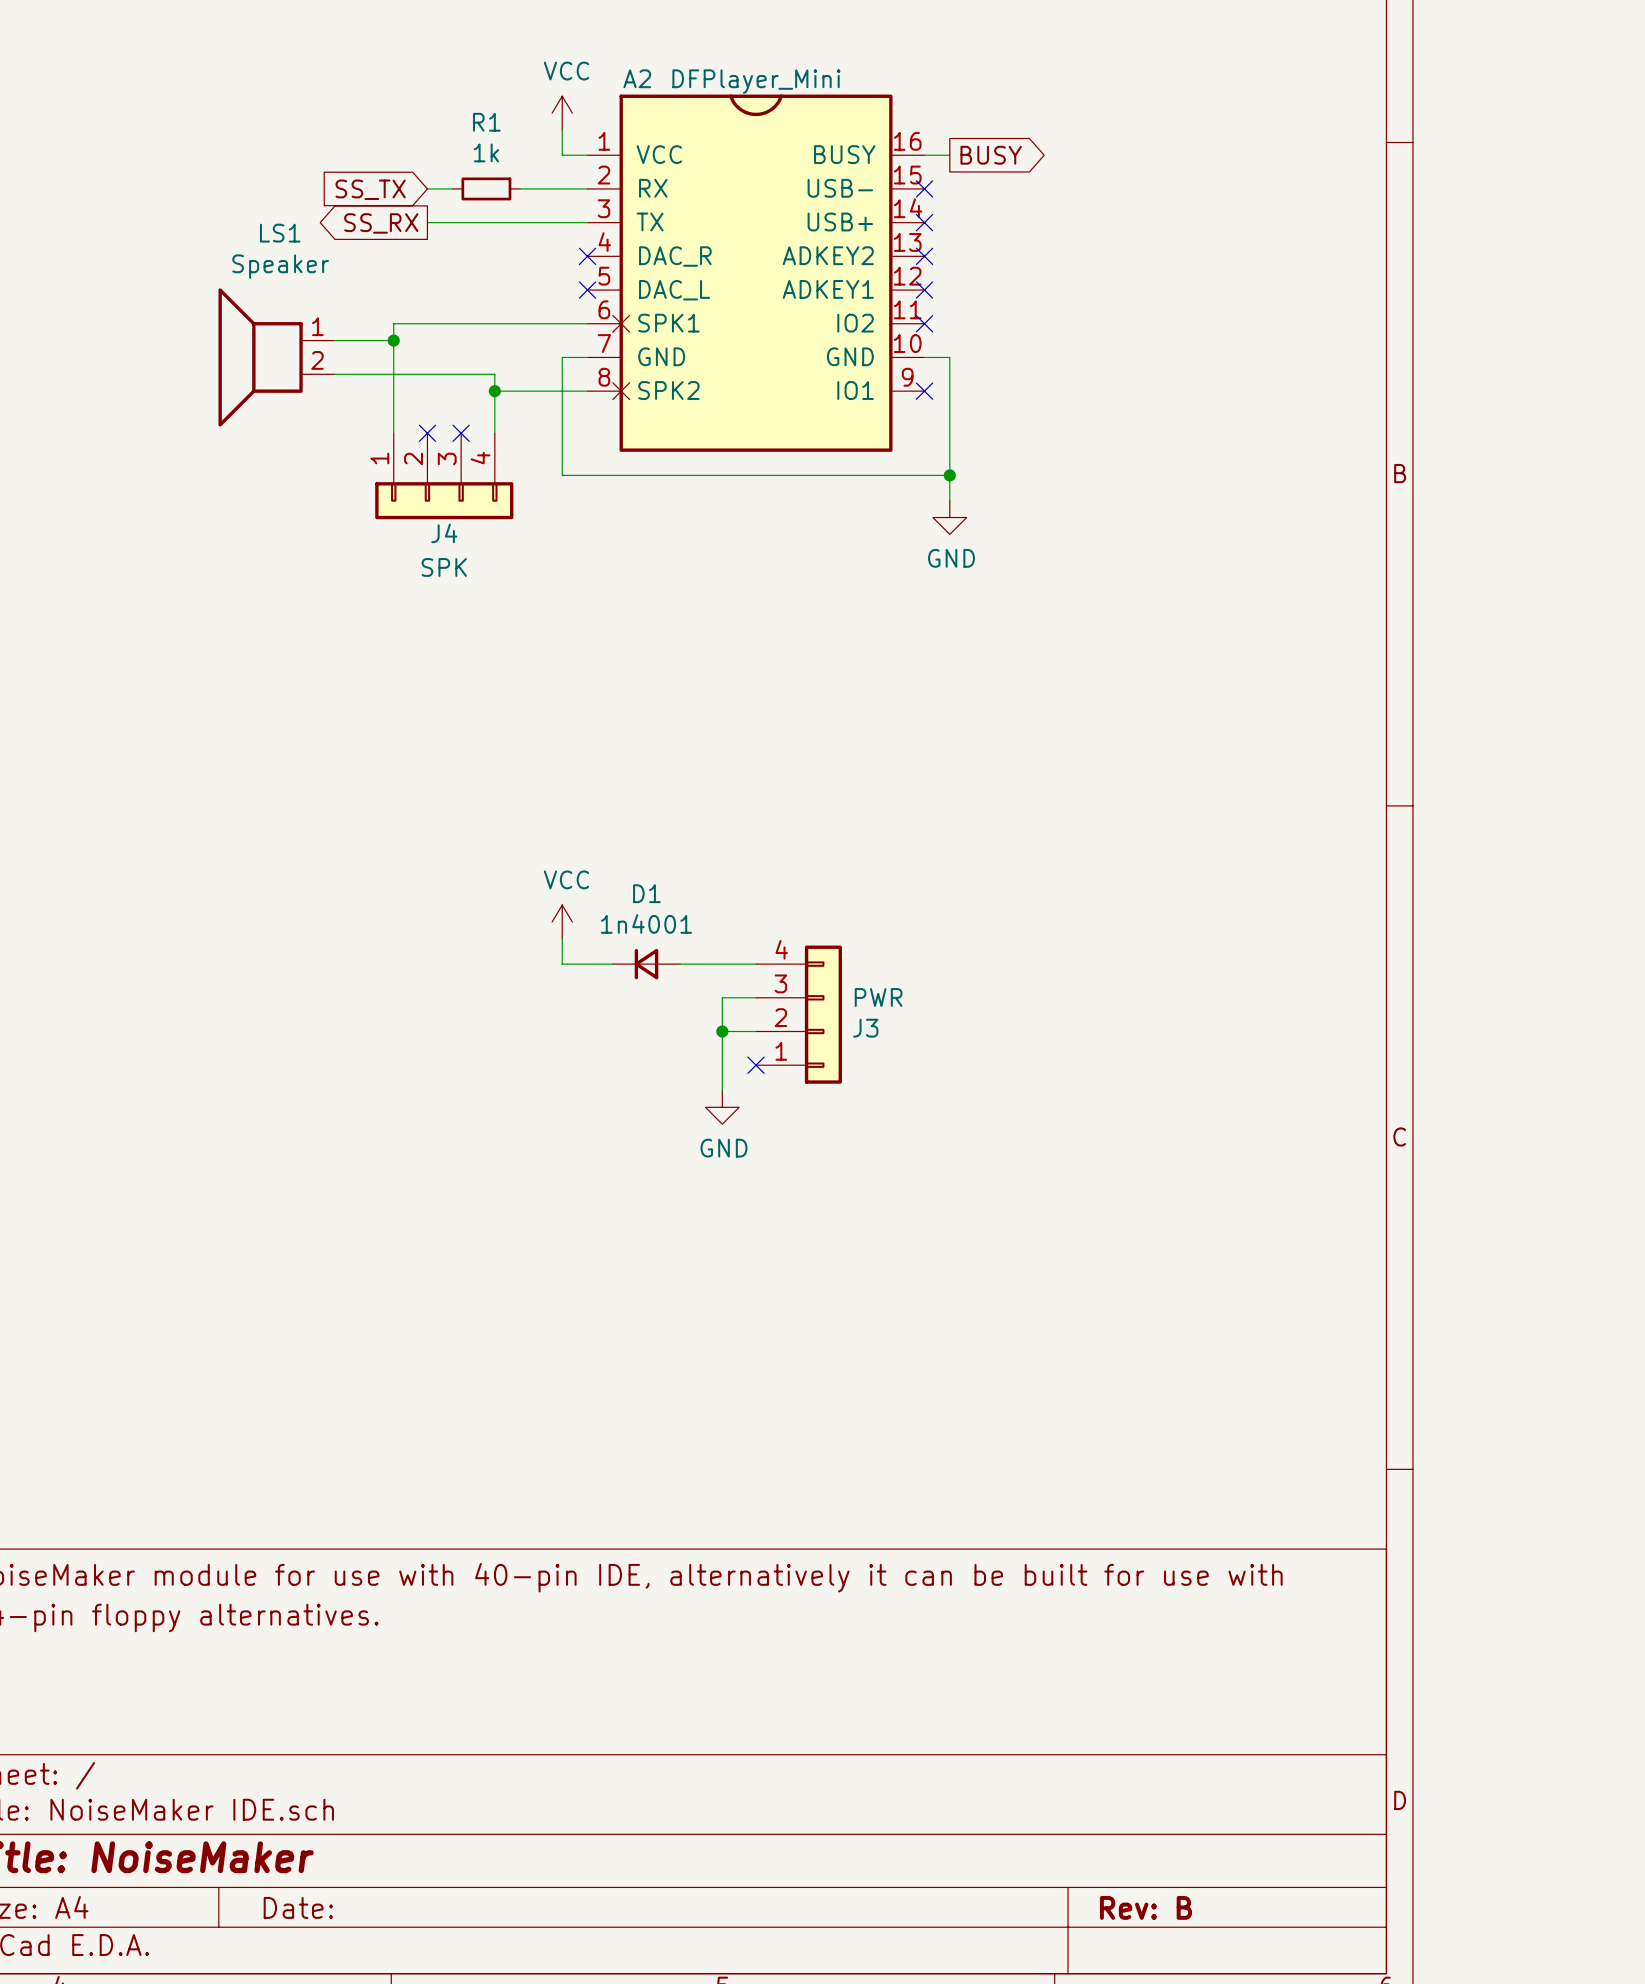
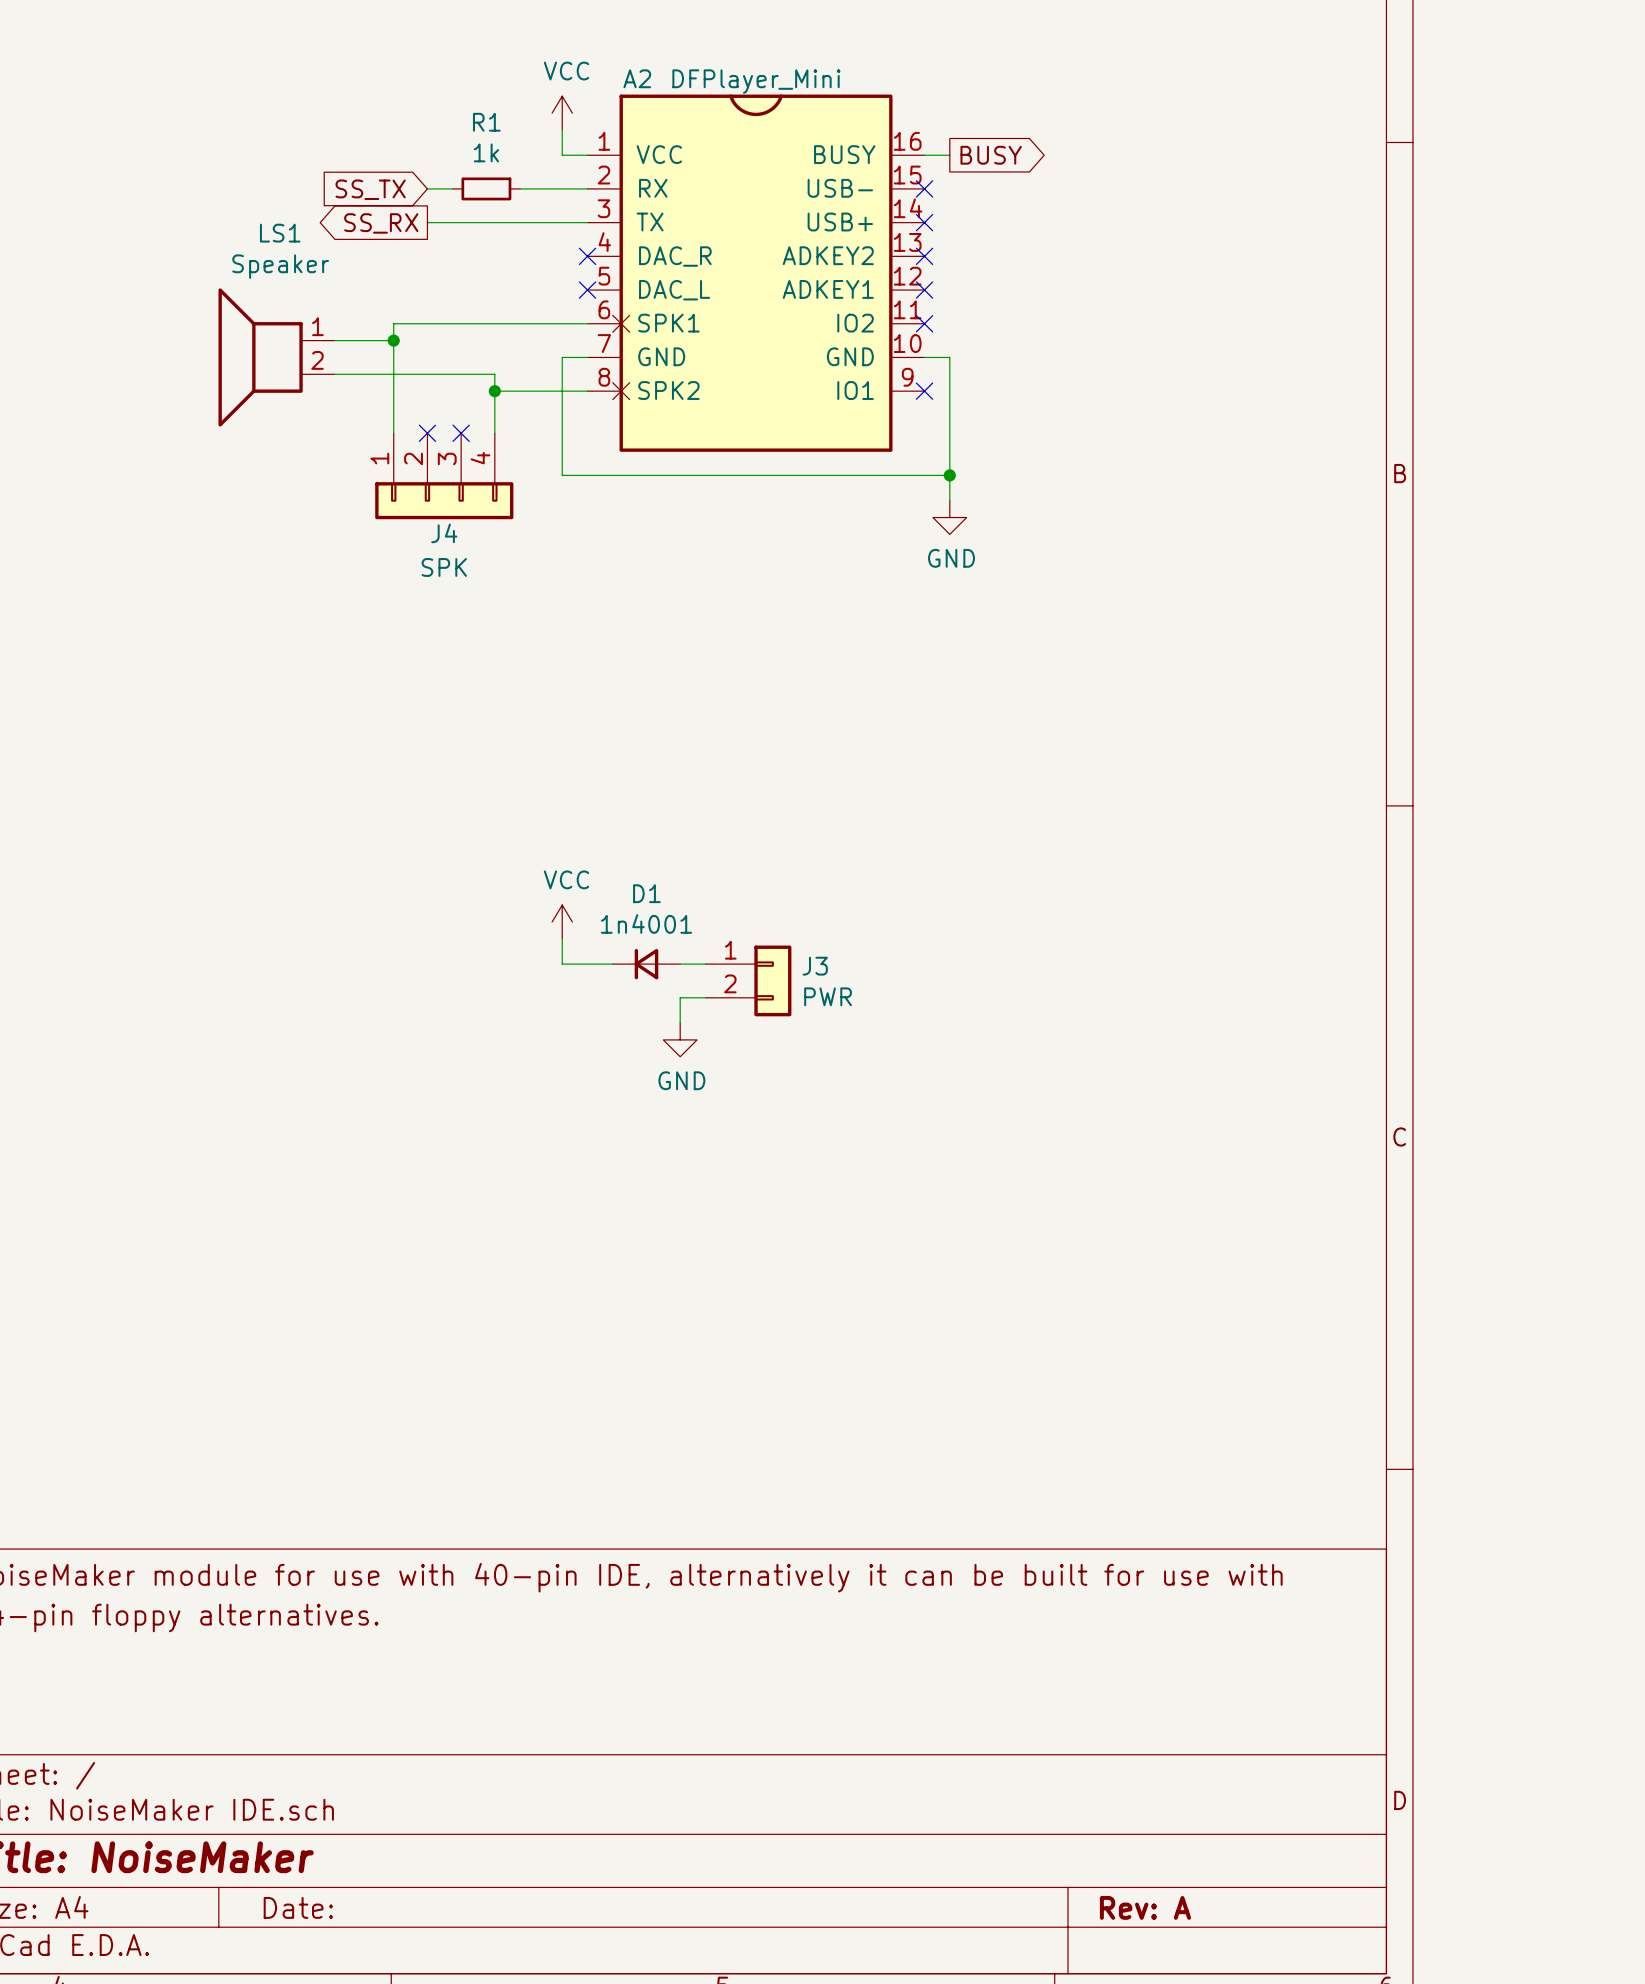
J3 symbol: [756, 945, 842, 1084] -> [705, 945, 792, 1017]
wire: none -> (705, 997) (680, 997) (680, 1023)
wire: (756, 997) (722, 997) (722, 1090) -> none
J3 value position: PWR (878, 997) -> PWR (828, 996)
J3 name position: J3 (865, 1028) -> J3 (815, 966)
wire: (722, 1031) (756, 1031) -> none
junction: (722, 1031) -> none
no-connect mark: (756, 1065) -> none
power symbol position: GND (722, 1107) -> GND (680, 1039)
title block: Rev: B (1145, 1907) -> Rev: A (1145, 1907)

